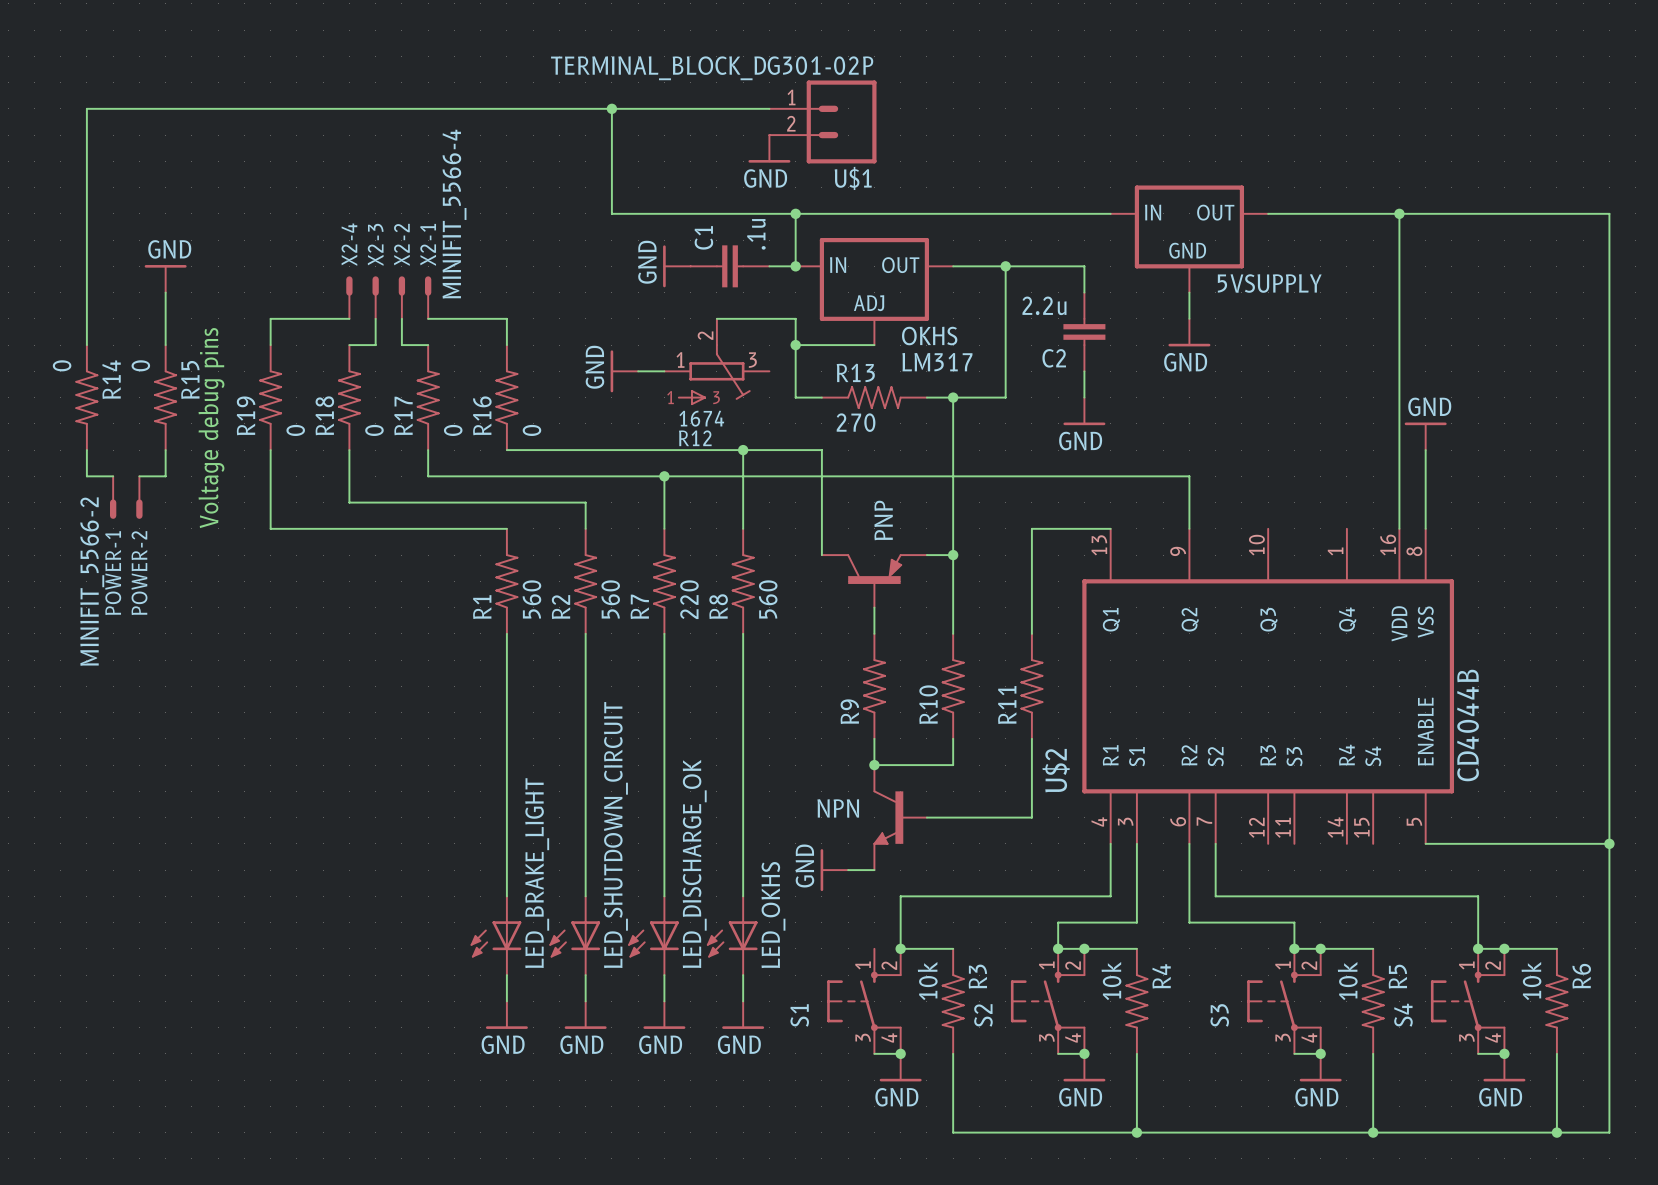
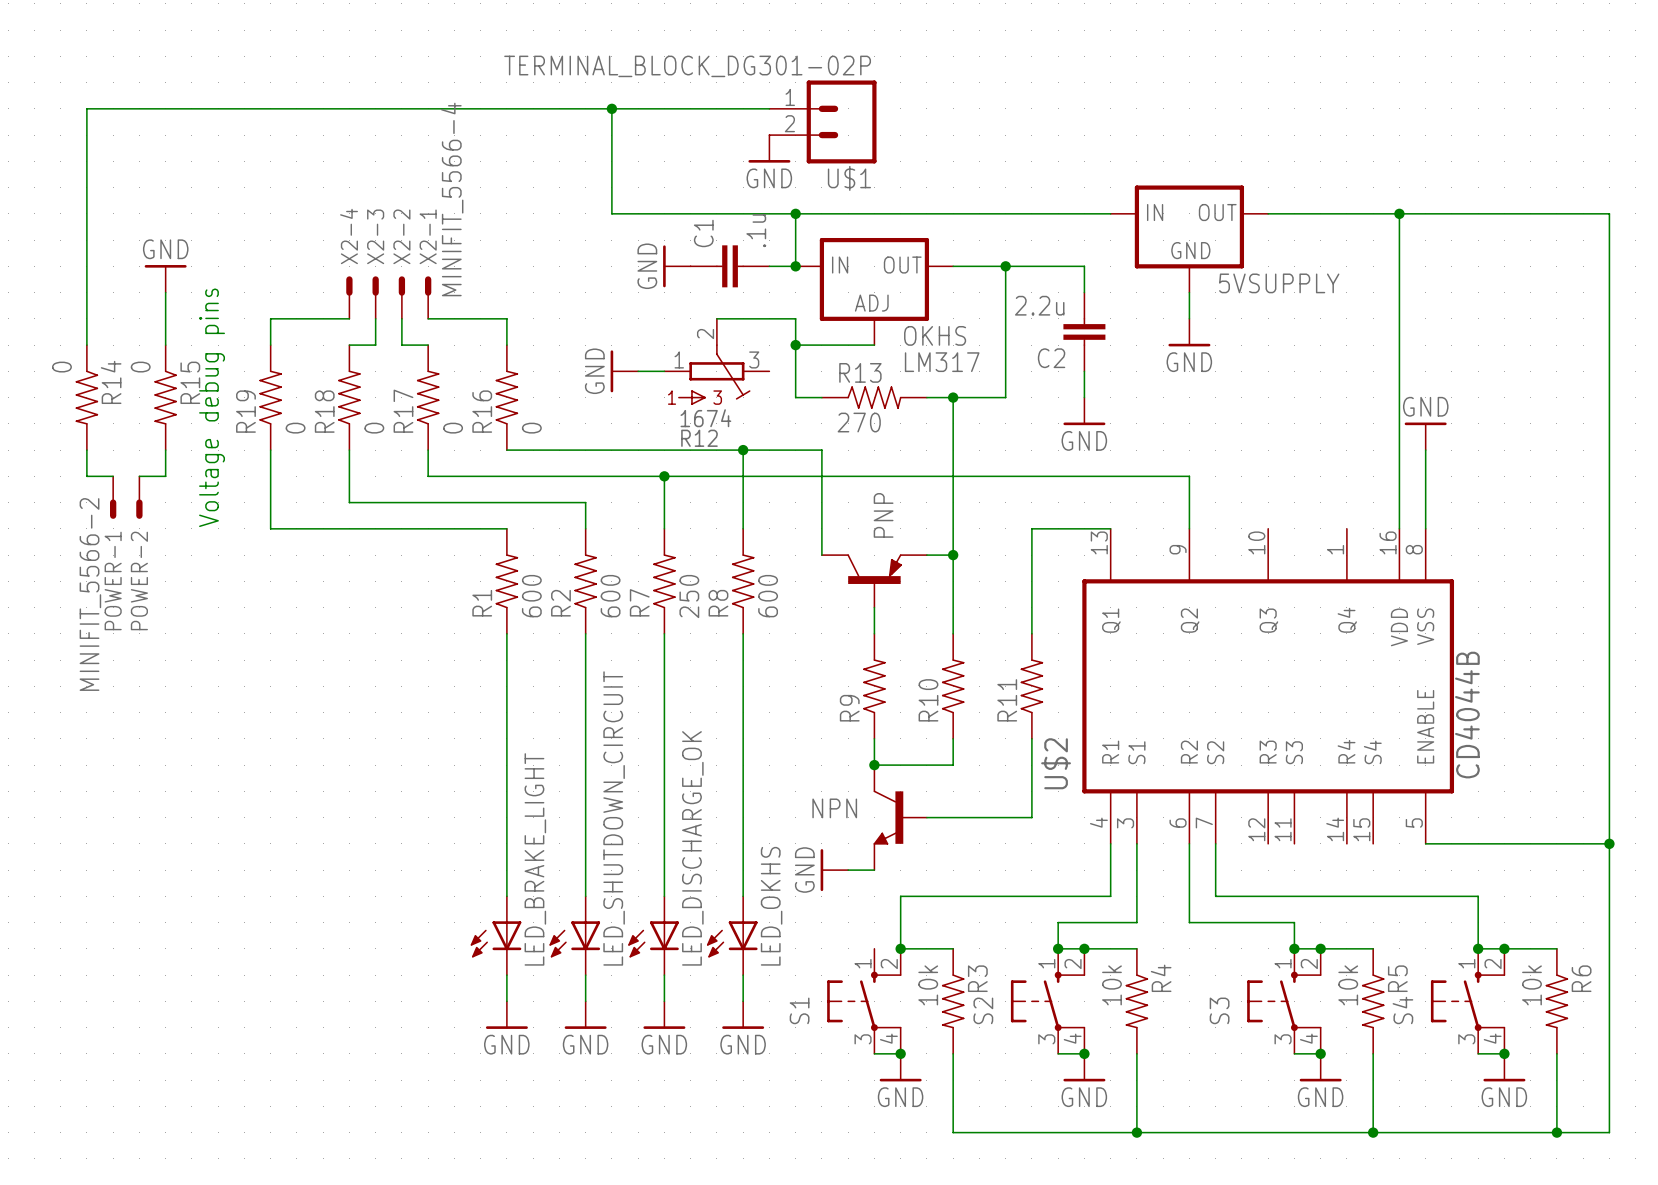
R1 value: 560 (531, 599) -> 600 (531, 596)
R2 value: 560 (610, 599) -> 600 (610, 596)
R7 value: 220 (689, 599) -> 250 (689, 596)
R8 value: 560 (768, 599) -> 600 (768, 596)

